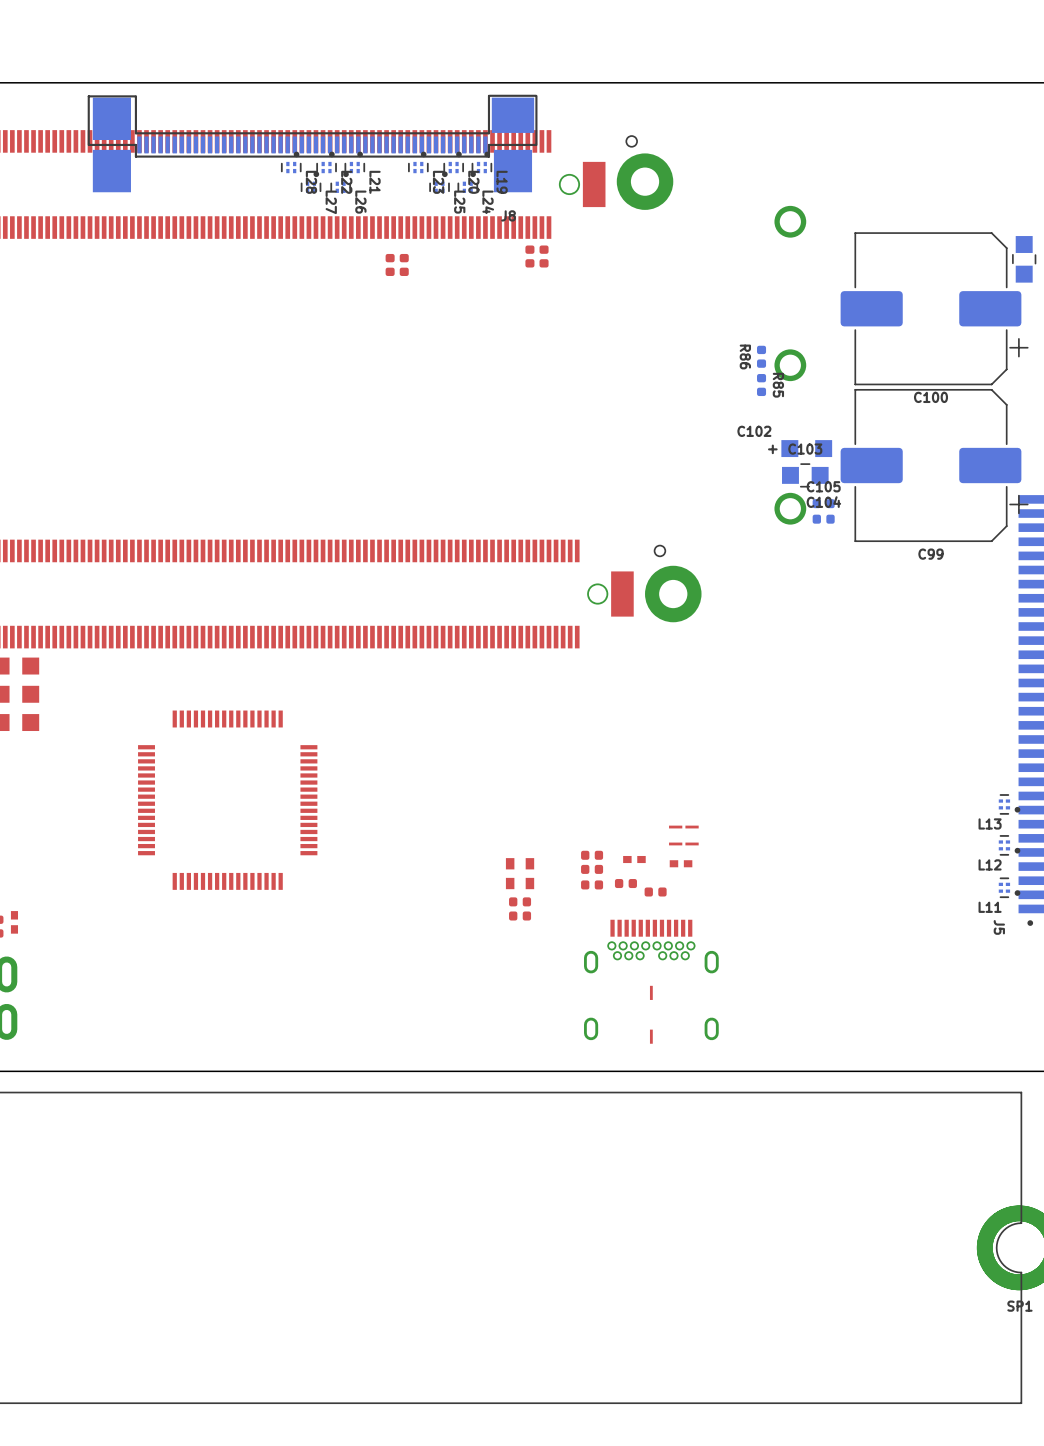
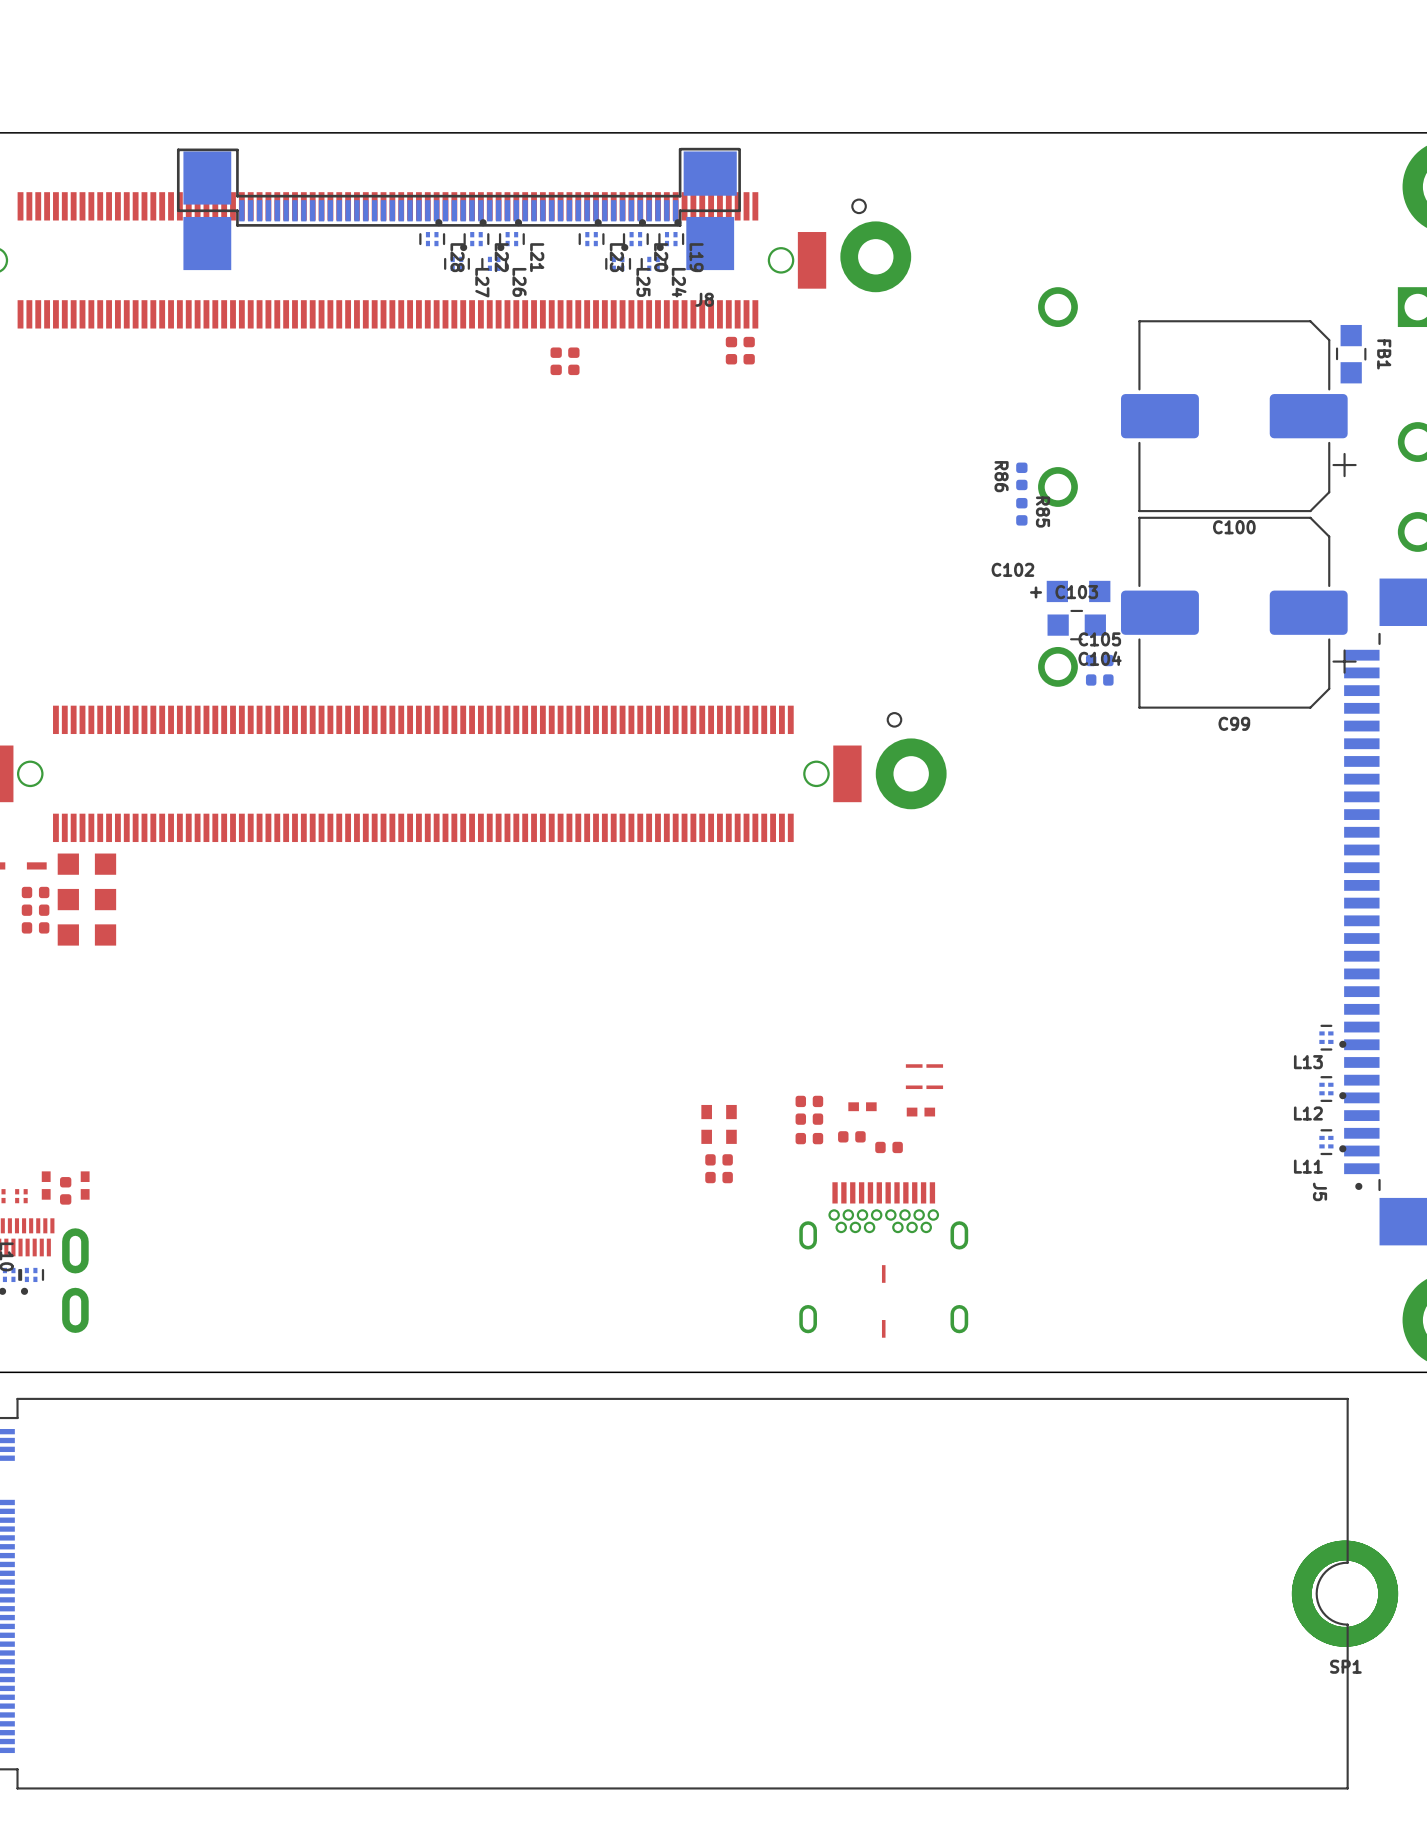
part: (227, 800) -> none

